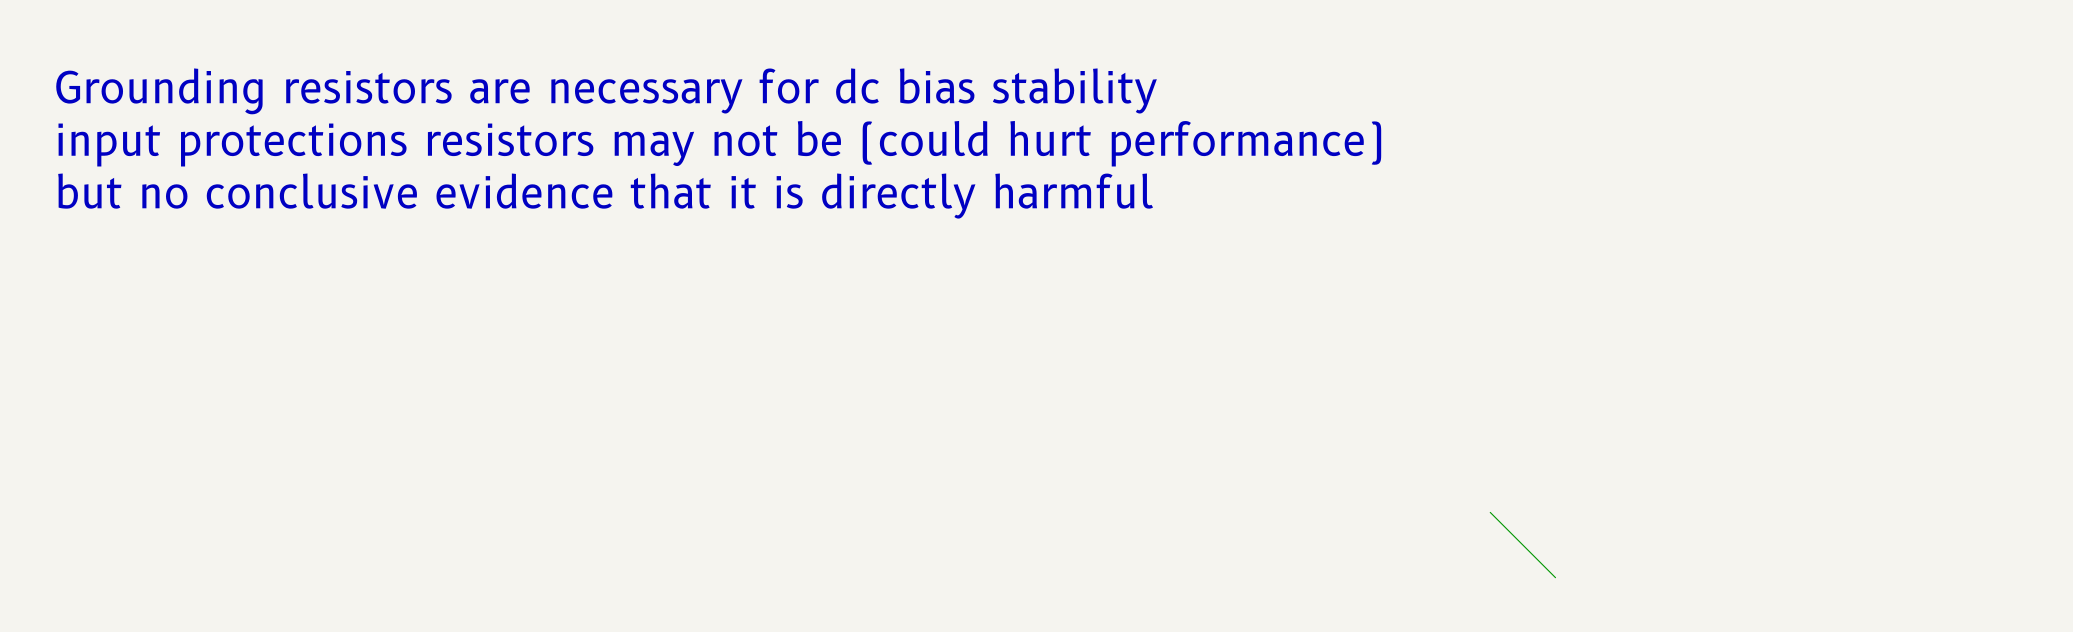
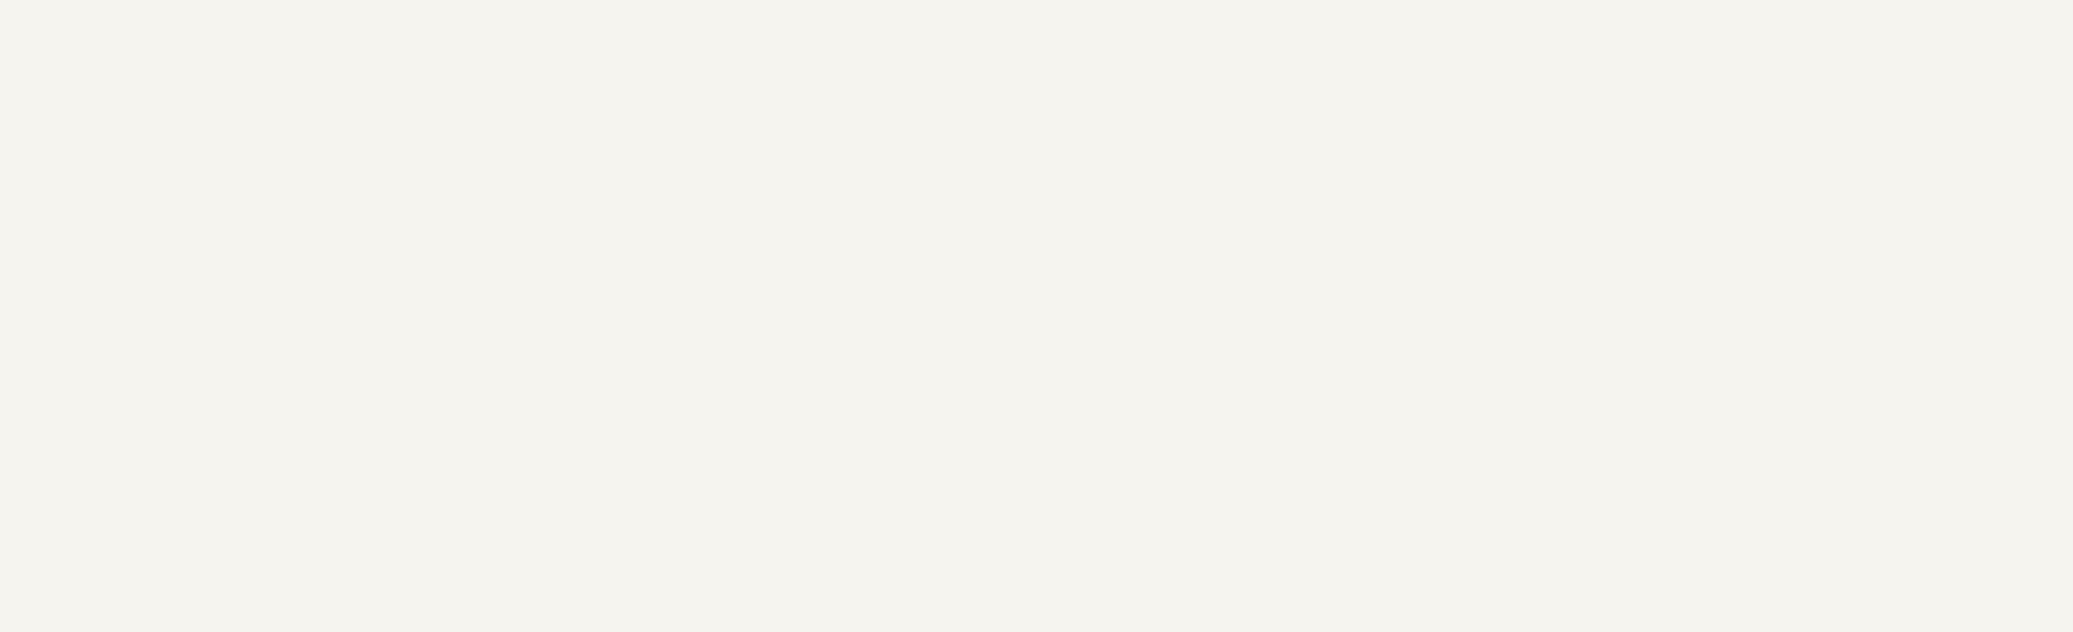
text: Grounding resistors are necessary for dc bias stability (606, 91) -> none
text: input protections resistors may not be (could hurt performance) (719, 143) -> none
text: but no conclusive evidence that it is directly harmful (605, 196) -> none
wire: (1490, 512) (1555, 577) -> none

